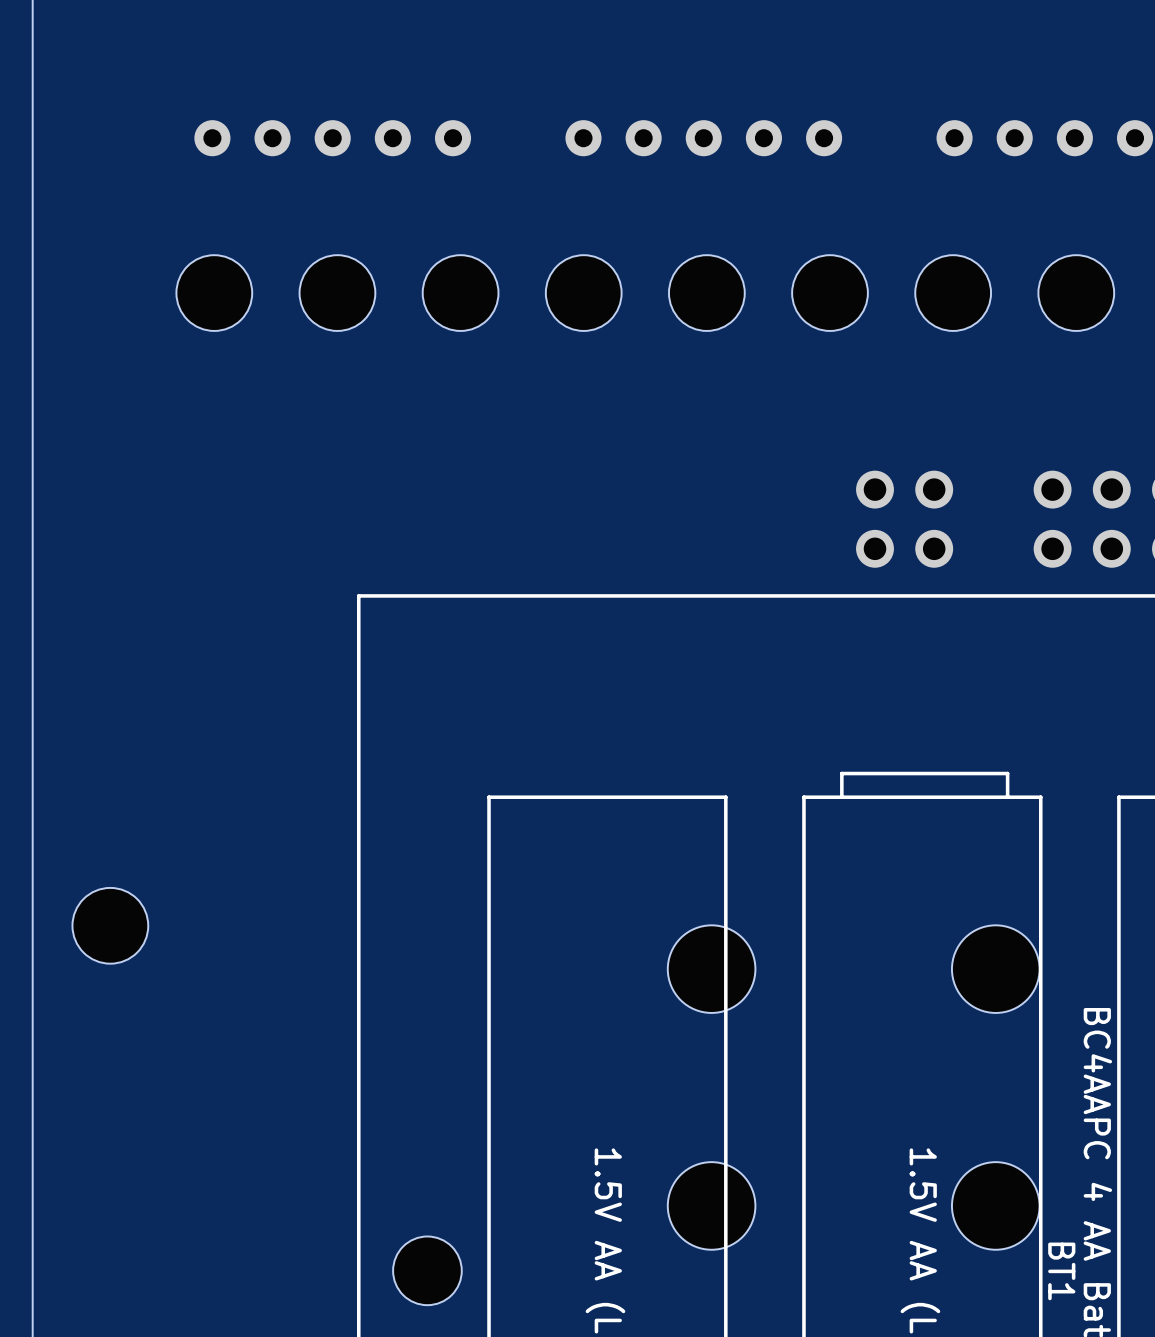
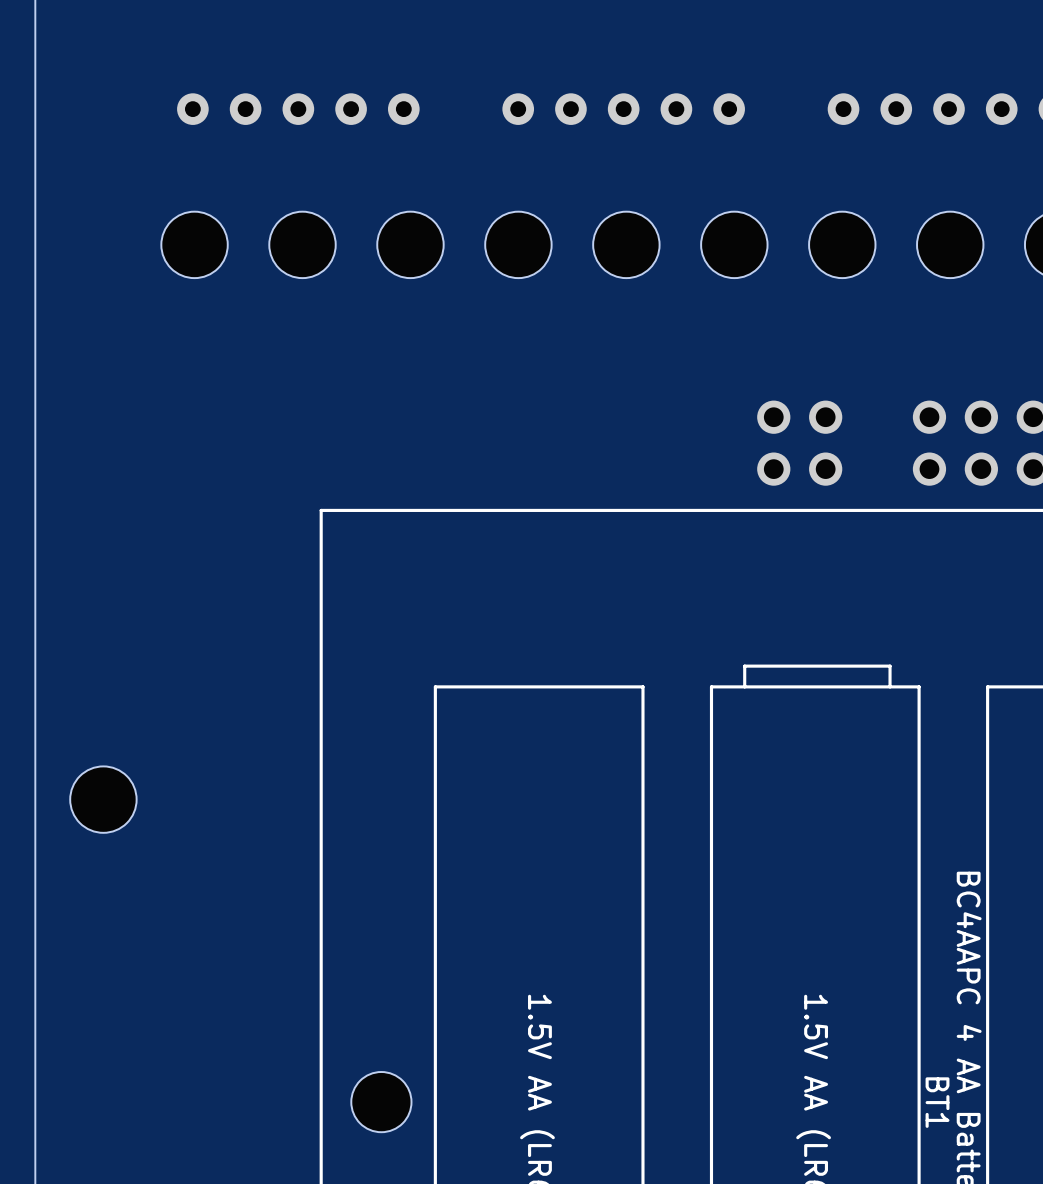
part: (711, 969) -> none
part: (995, 969) -> none
part: (711, 1205) -> none
part: (995, 1205) -> none

